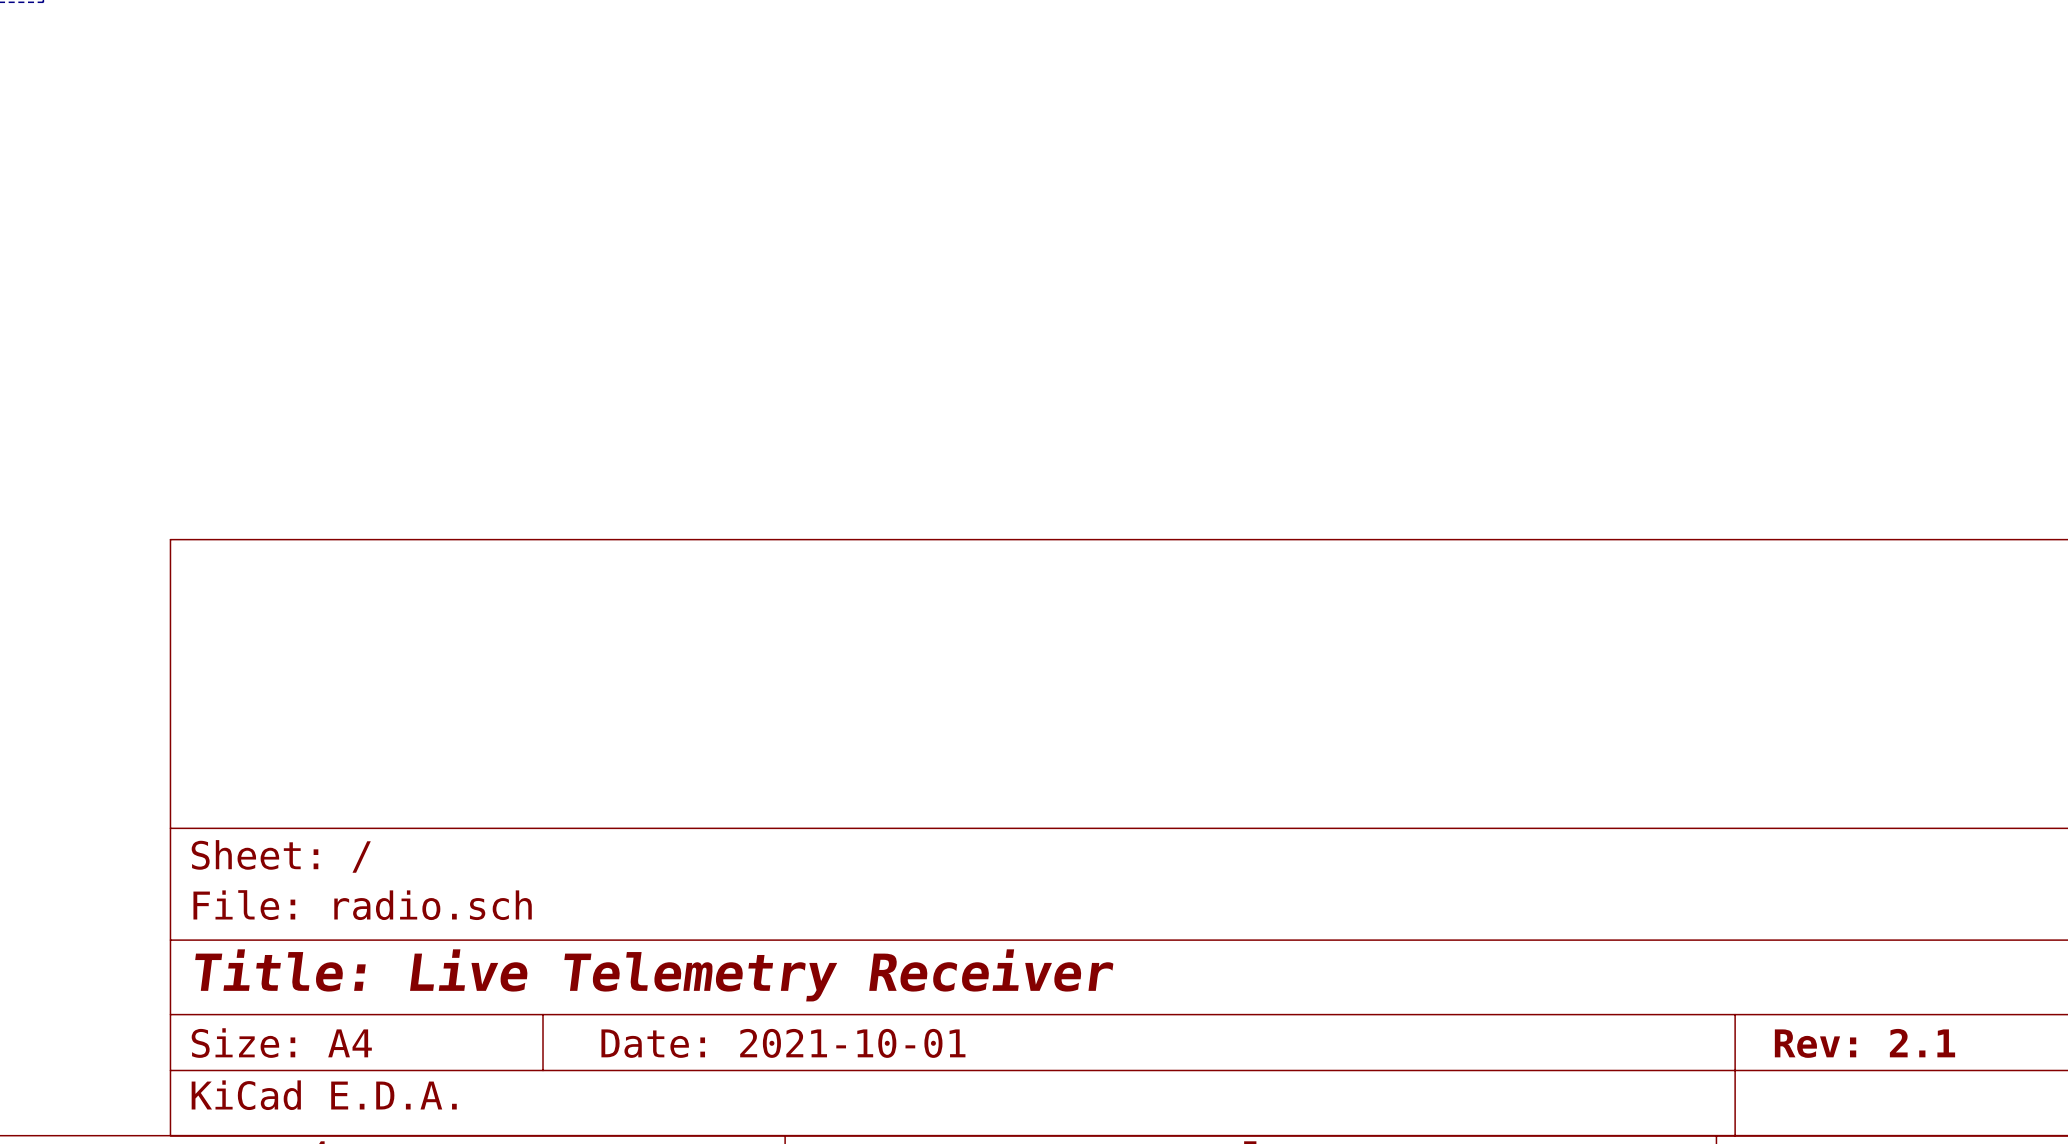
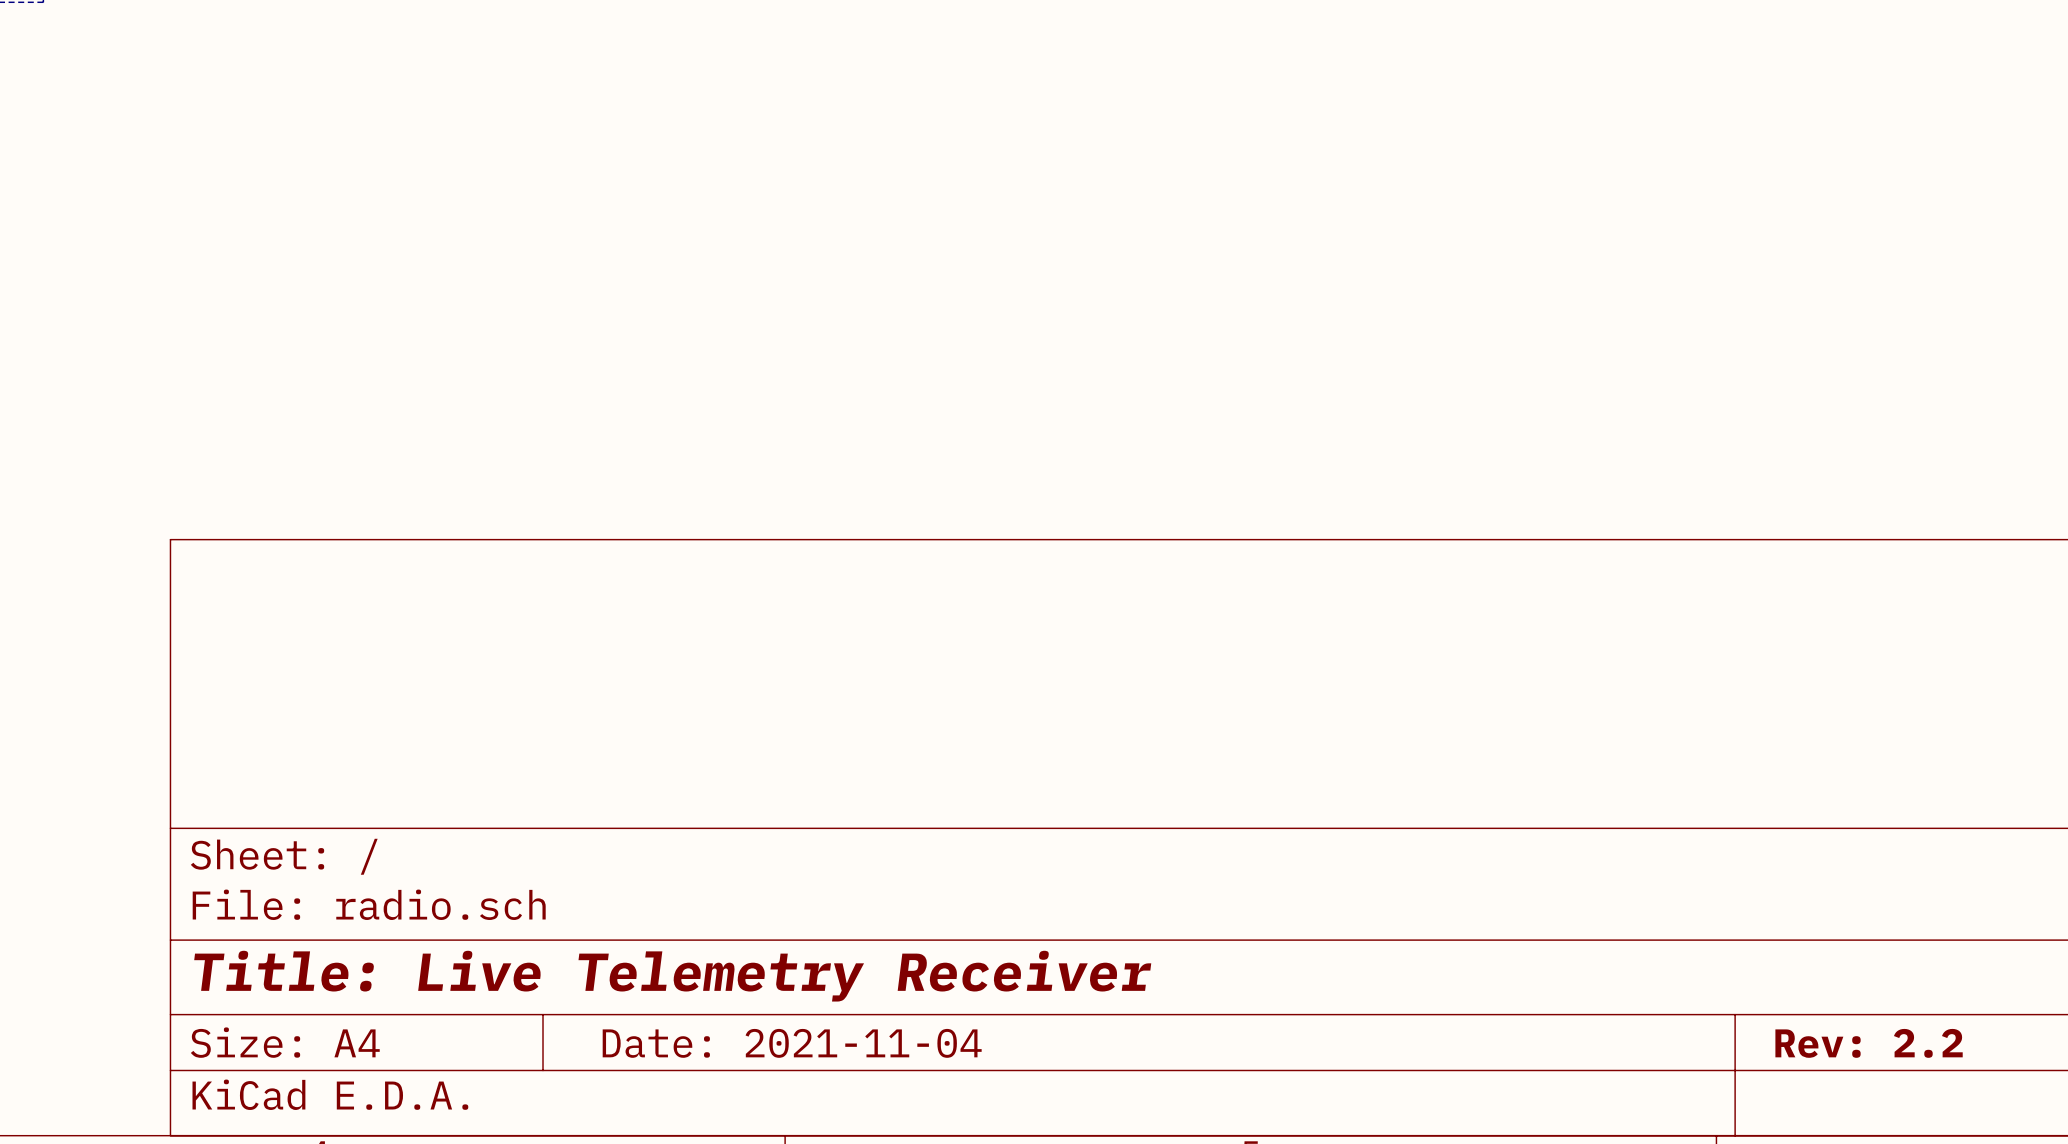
title block: Date: 2021-10-01 (783, 1043) -> Date: 2021-11-04 (792, 1043)
title block: Rev: 2.1 (1864, 1043) -> Rev: 2.2 (1869, 1043)

